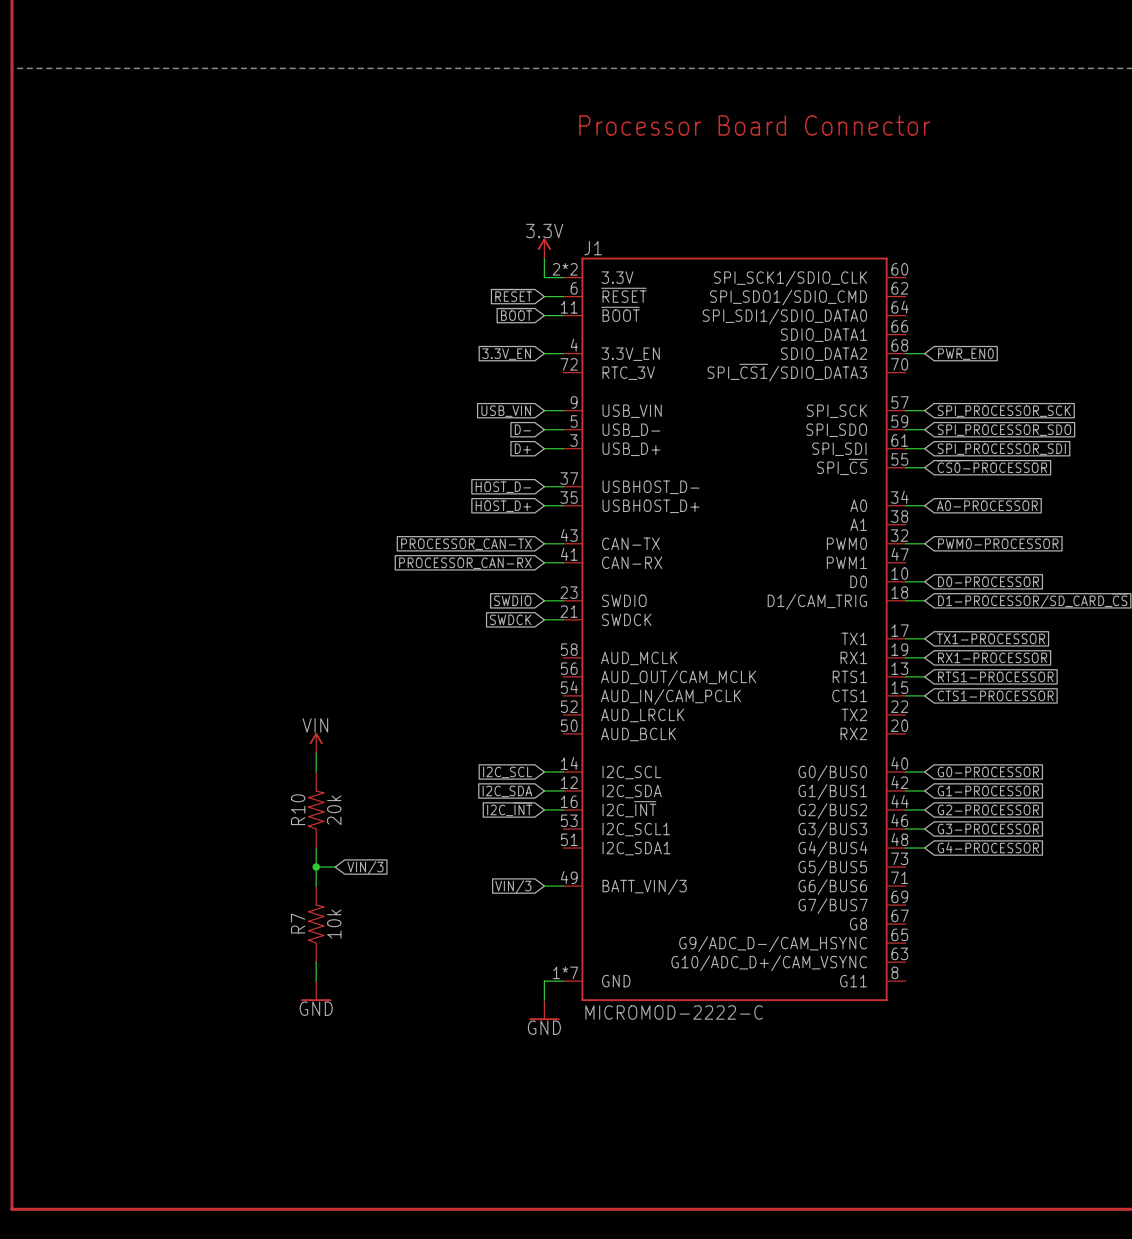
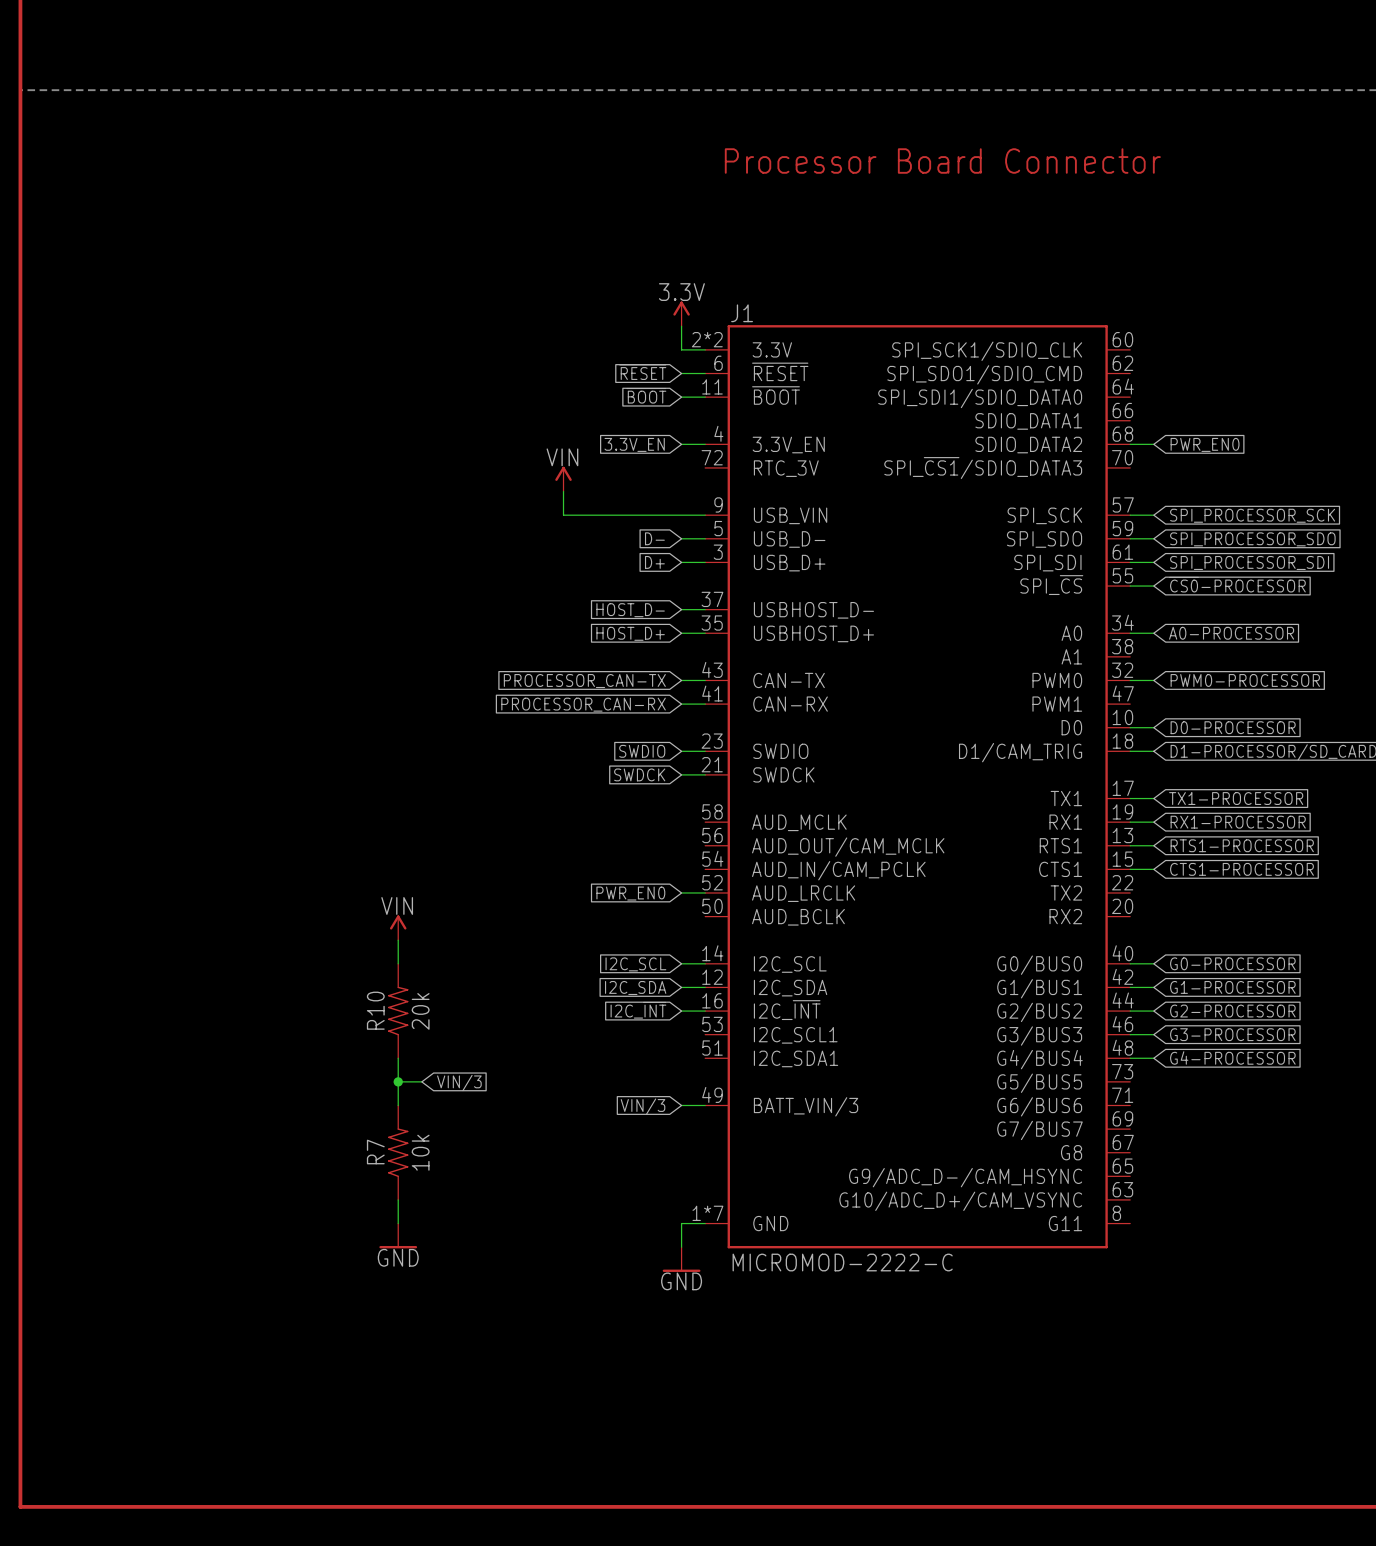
power symbol: none -> VIN (563, 479)
wire: none -> (563, 491) (563, 515) (681, 515)
global label: USB_VIN (506, 411) -> none
wire: none -> (681, 892) (705, 892)
global label: none -> PWR_EN0 (630, 893)

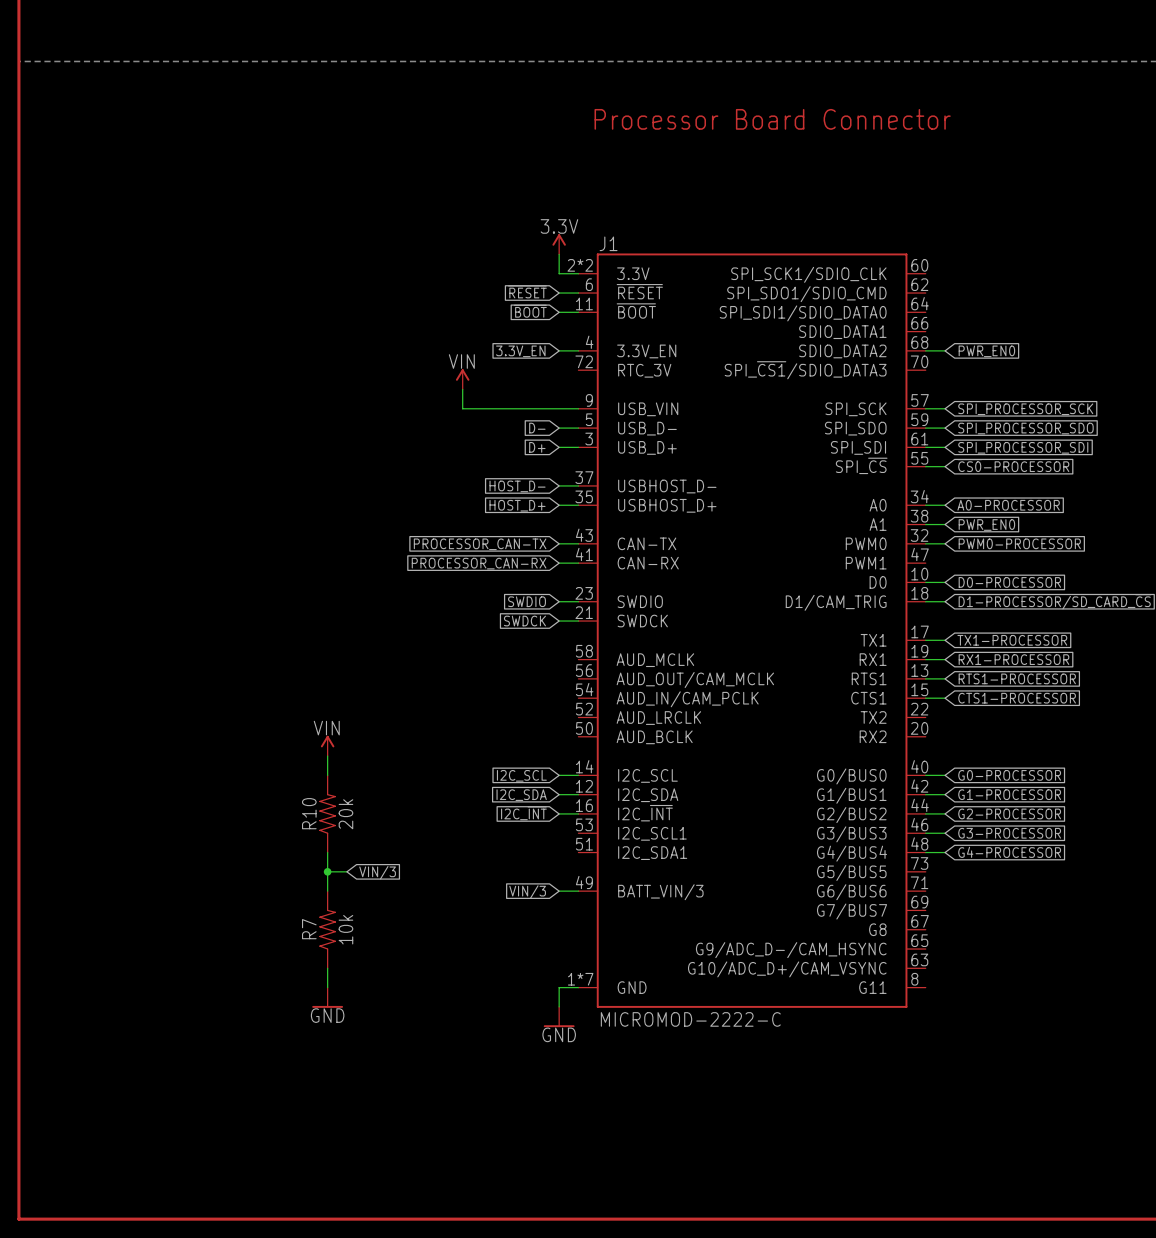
wire: none -> (925, 524) (945, 524)
global label: none -> PWR_EN0 (986, 525)
wire: (681, 892) (705, 892) -> none
global label: PWR_EN0 (630, 893) -> none

